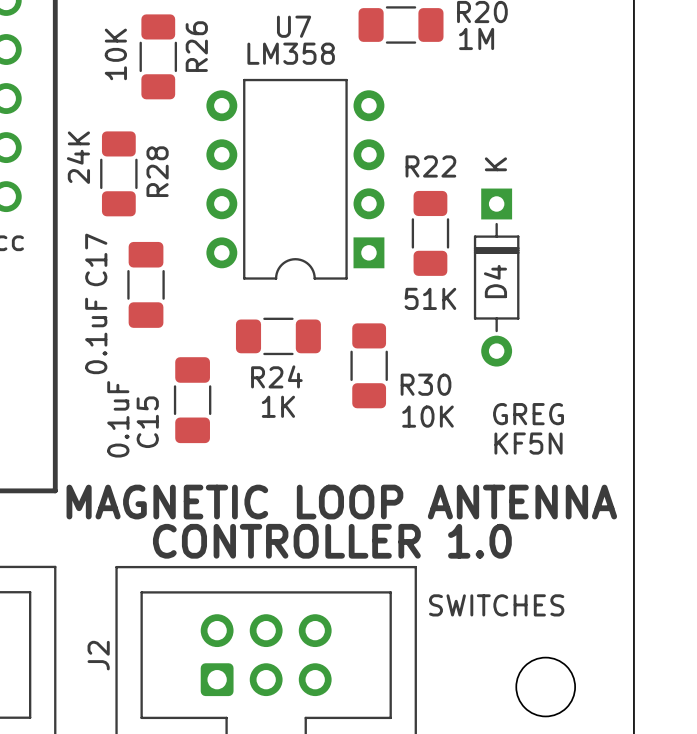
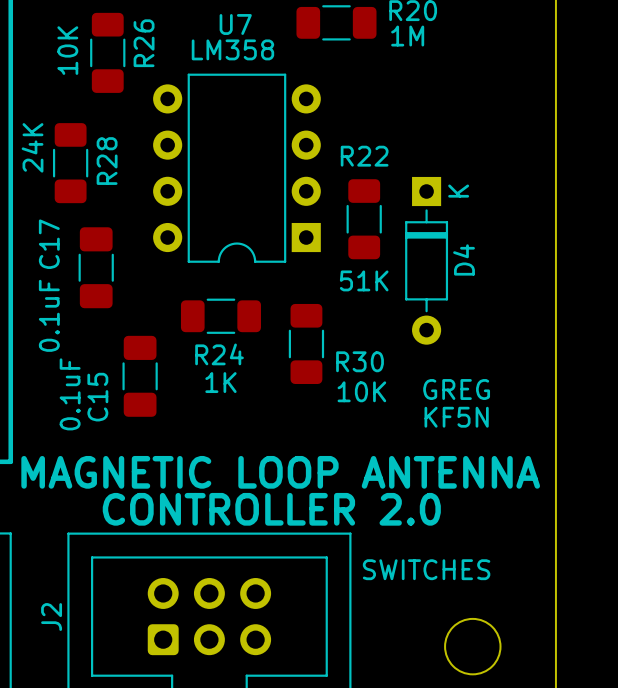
D4 text position: K (495, 164) -> K (458, 191)
D4 name position: D4 (495, 281) -> D4 (464, 259)
text: CONTROLLER 1.0 (332, 541) -> CONTROLLER 2.0 (271, 509)

